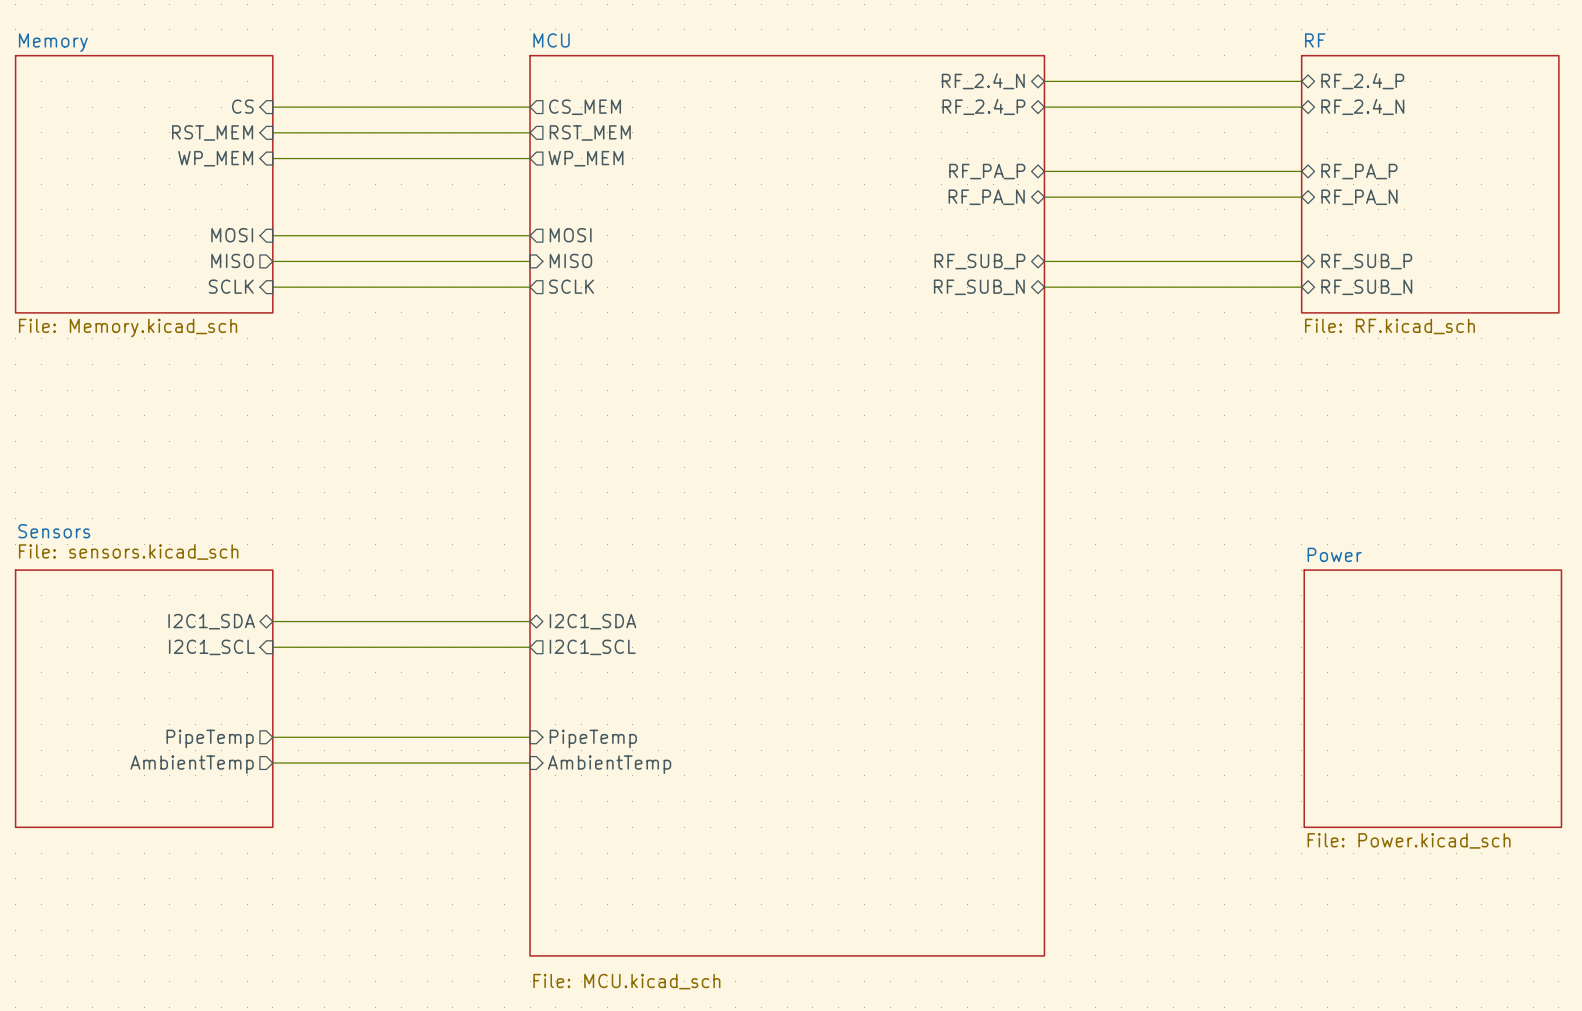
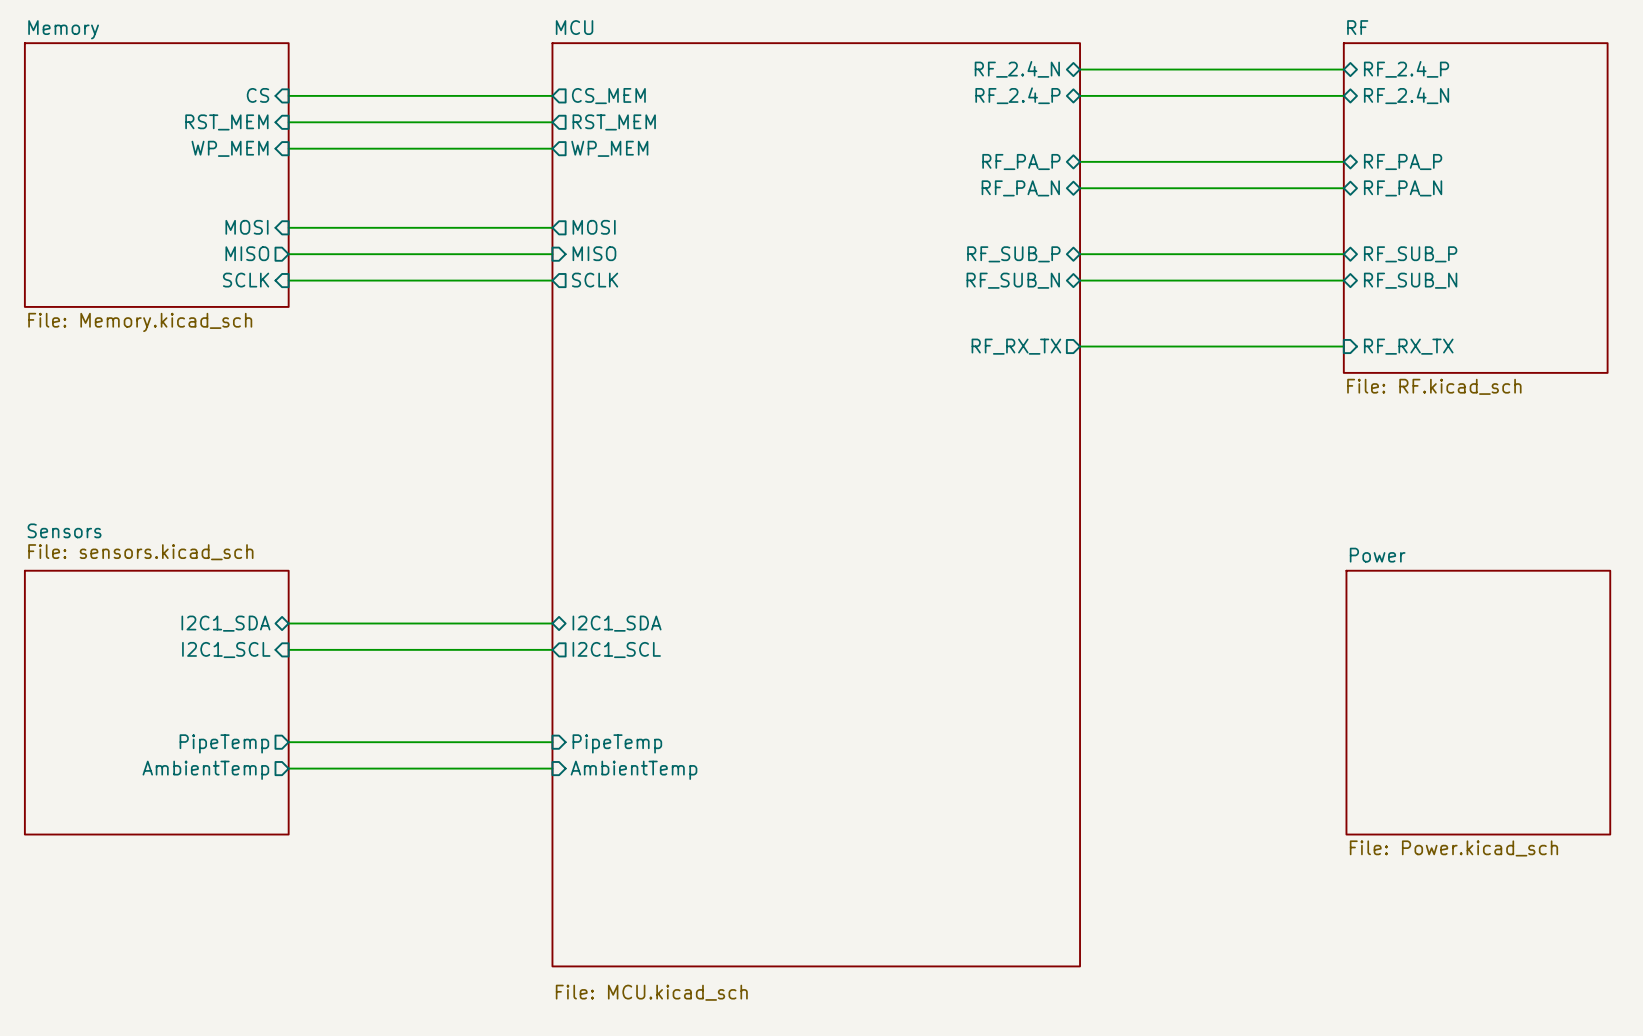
sheet RF: File: RF.kicad_sch (1430, 184) -> none
sheet RF: none -> File: RF.kicad_sch (1475, 208)
sheet pin: none -> RF_RX_TX (1016, 346)
wire: none -> (1080, 346) (1343, 346)
sheet pin: none -> RF_RX_TX (1408, 346)

